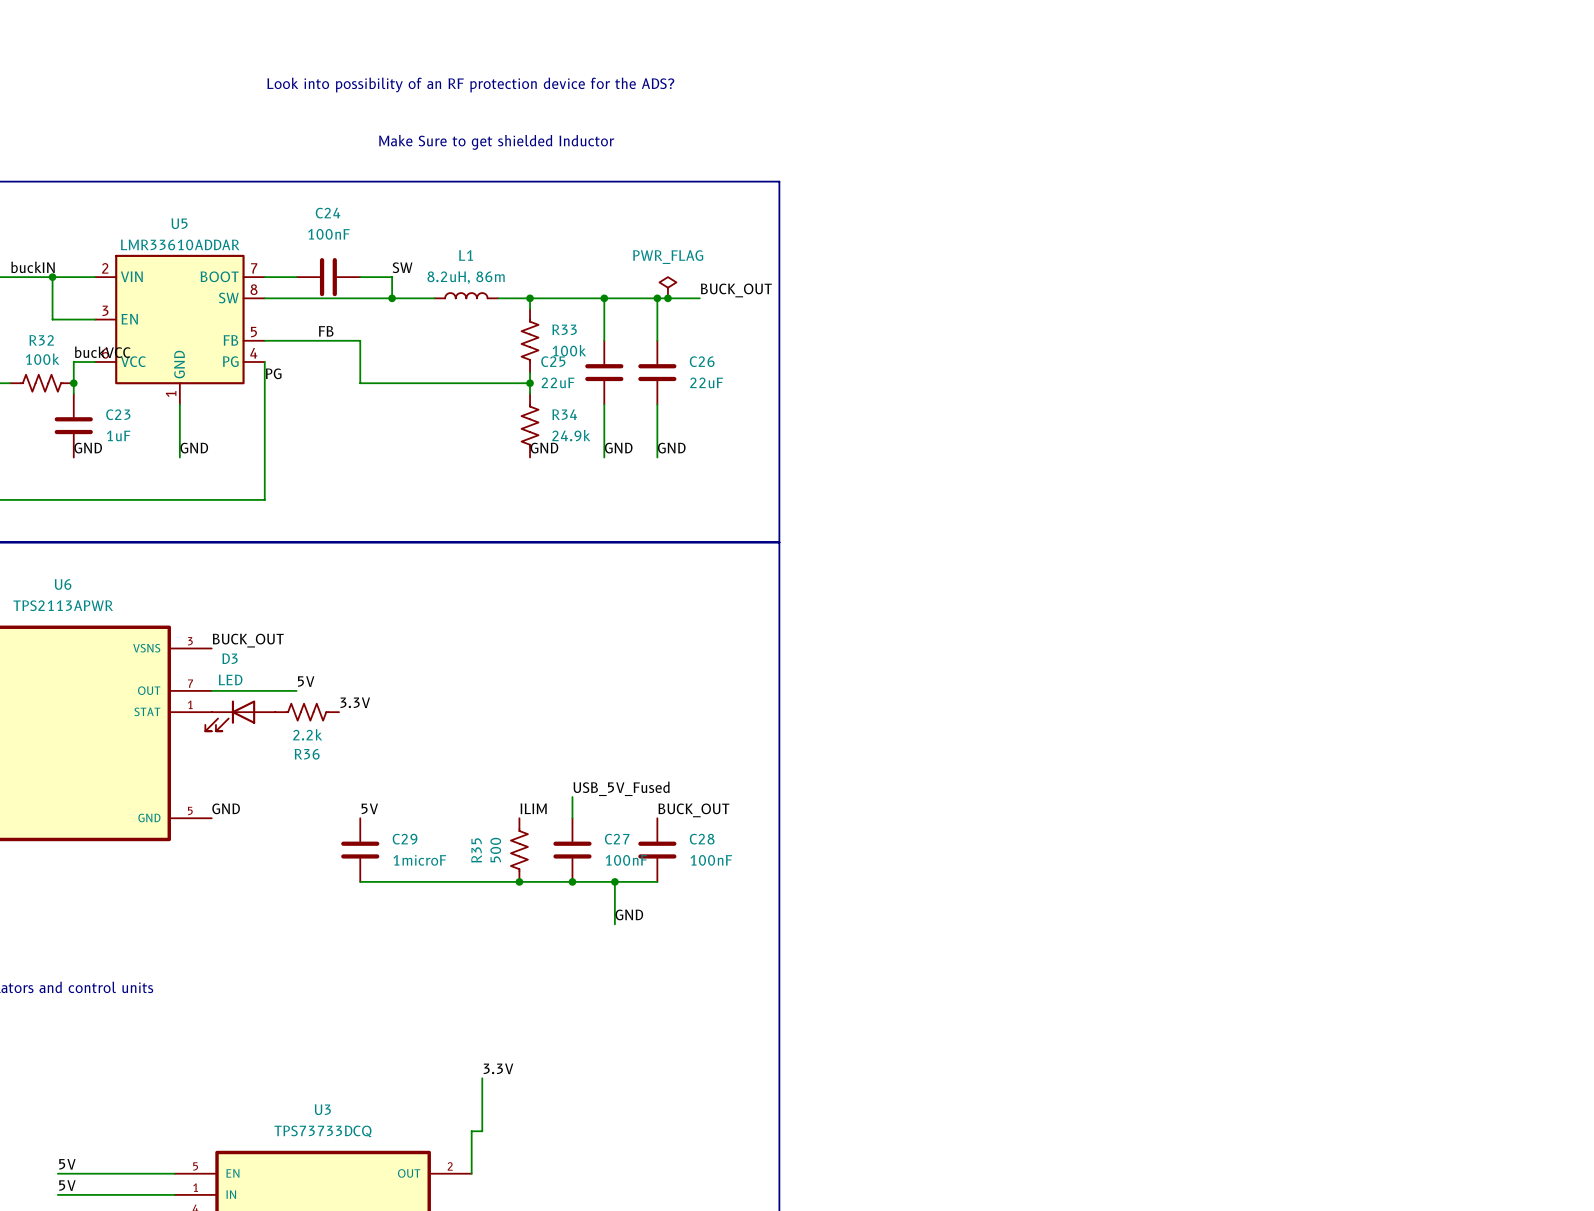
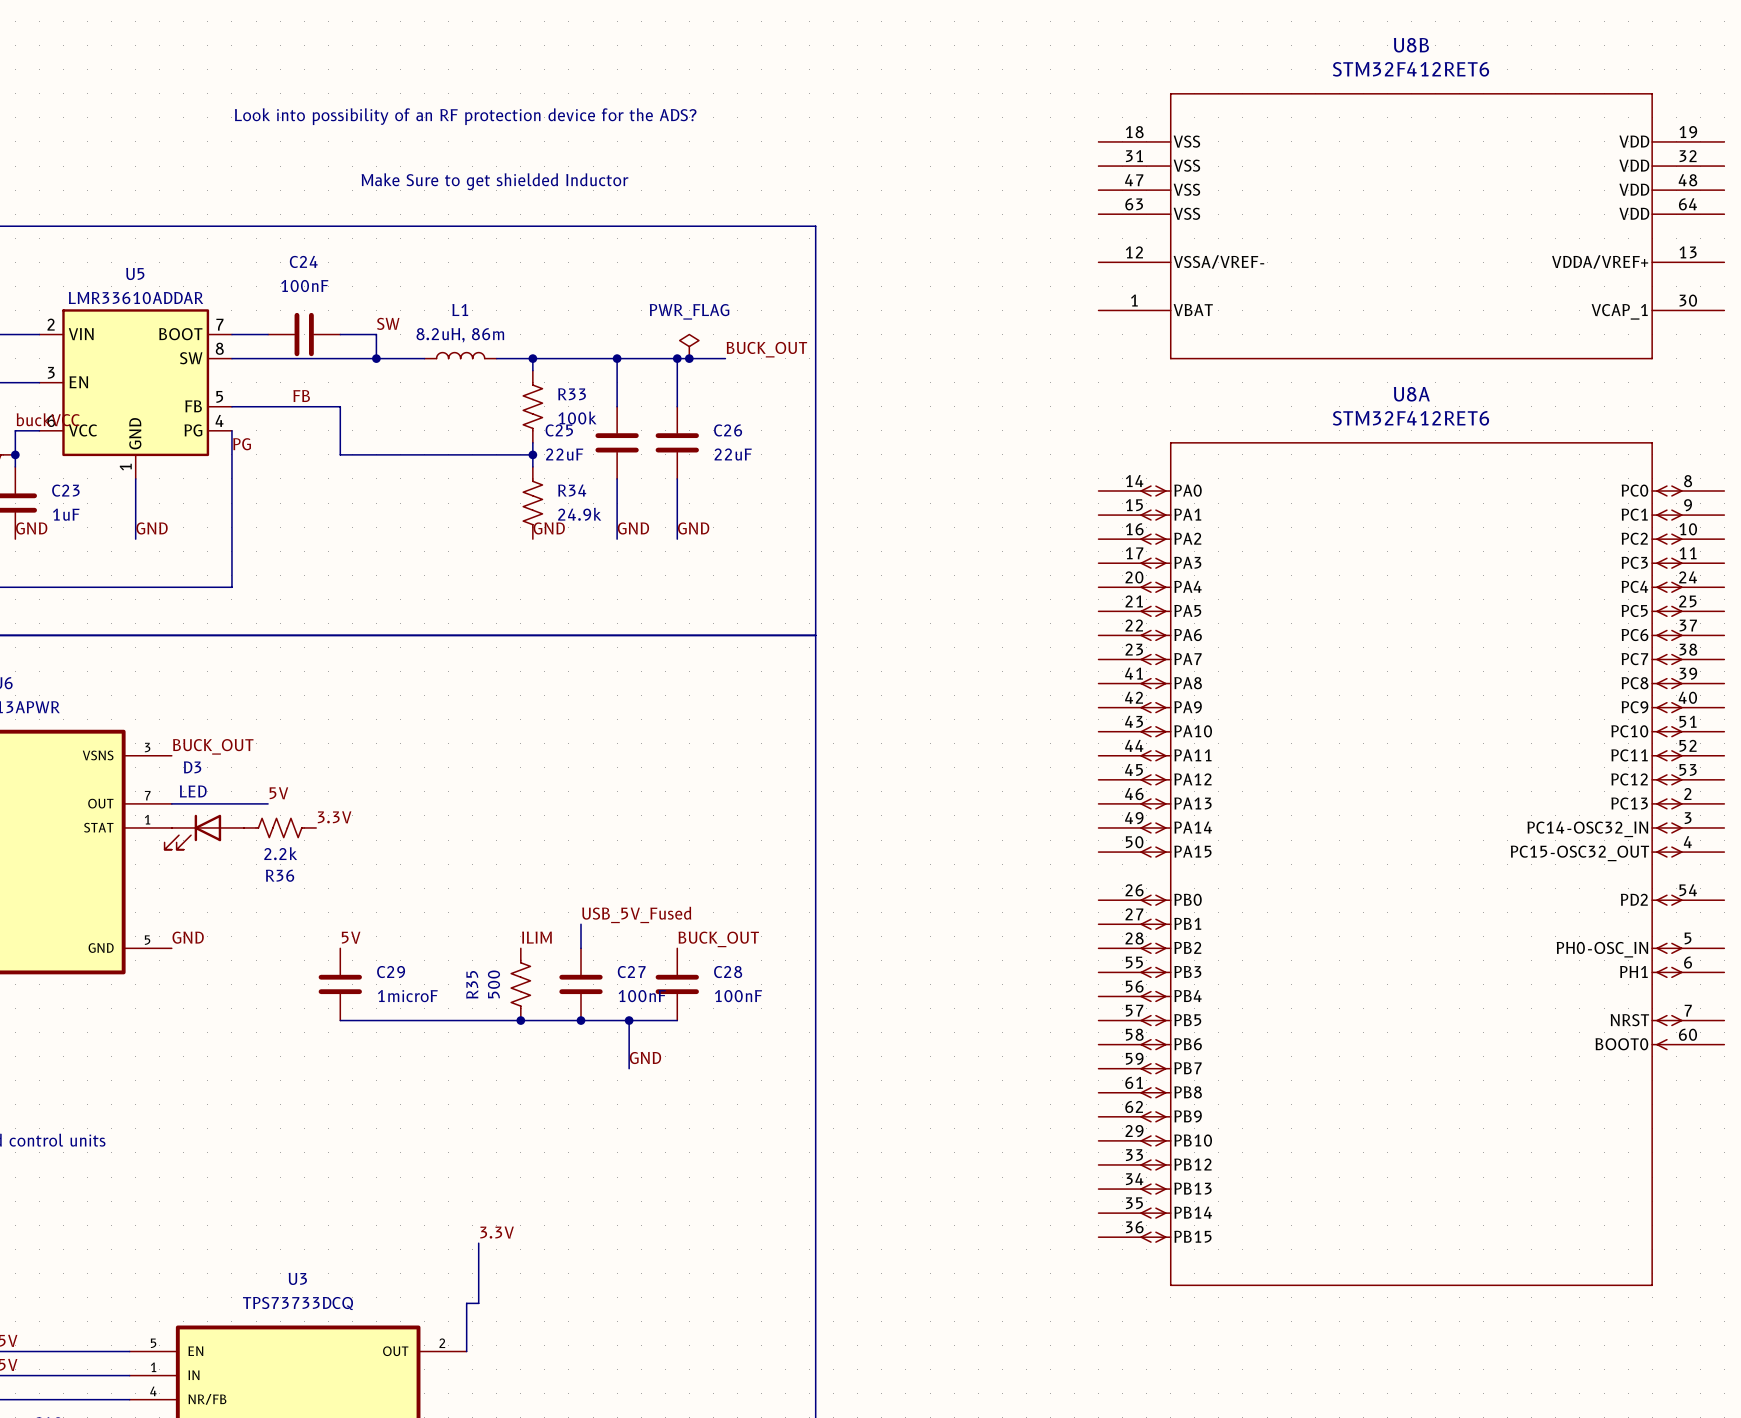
U8B: none -> STM32F412RET6 (1411, 226)
U8A: none -> STM32F412RET6 (1411, 864)

